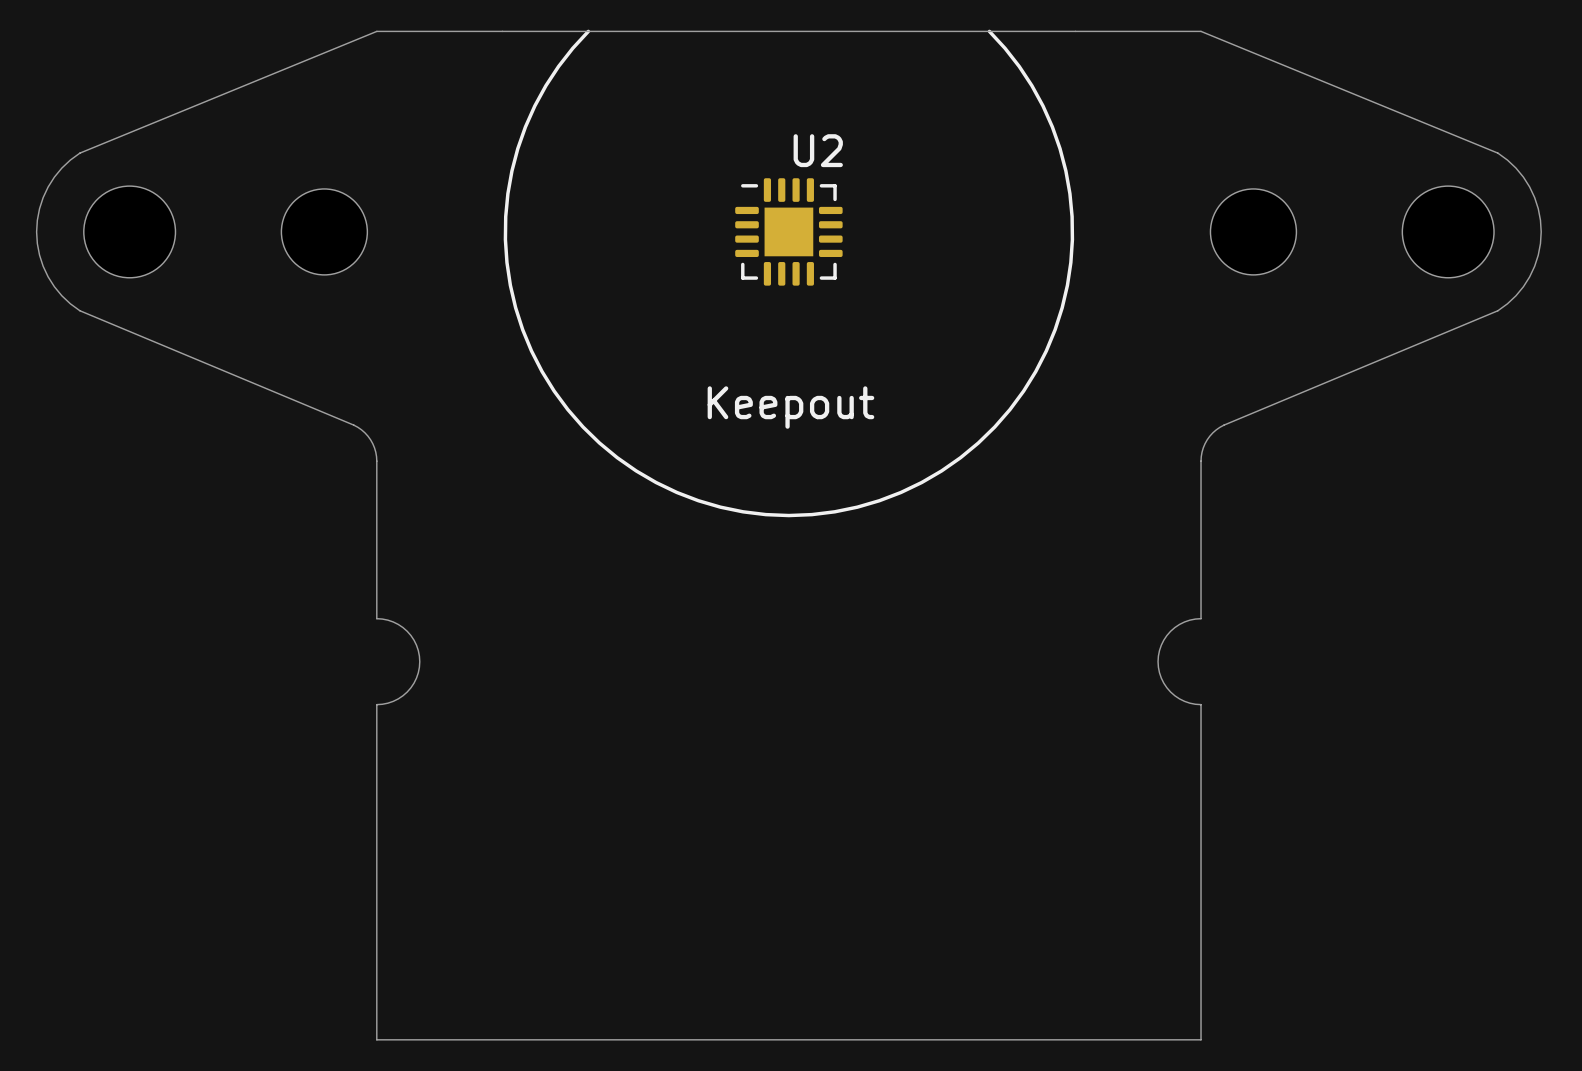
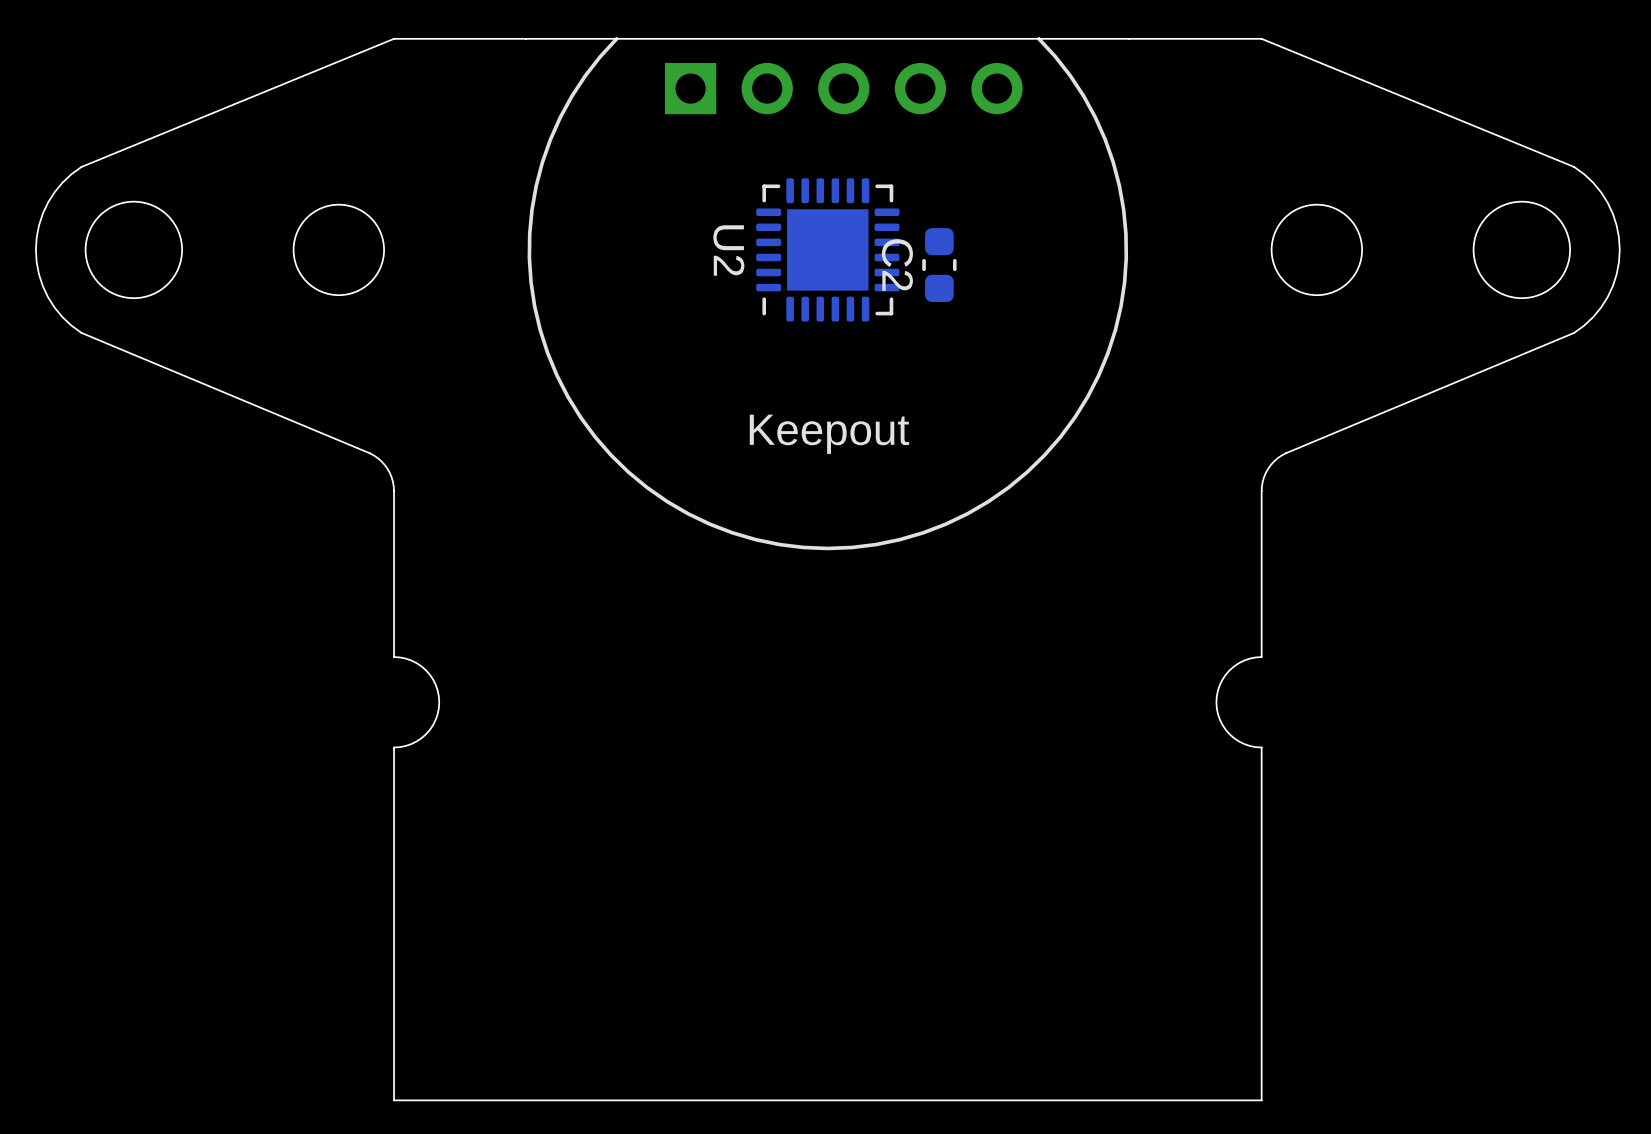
part: none -> (843, 88)
U2 name rotation: 0° (818, 150) -> 90° clockwise (728, 250)
U2 name position: U2 (818, 150) -> U2 (728, 250)
U2 footprint: [735, 178, 843, 286] -> [756, 178, 900, 322]
C2: none -> (939, 265)

